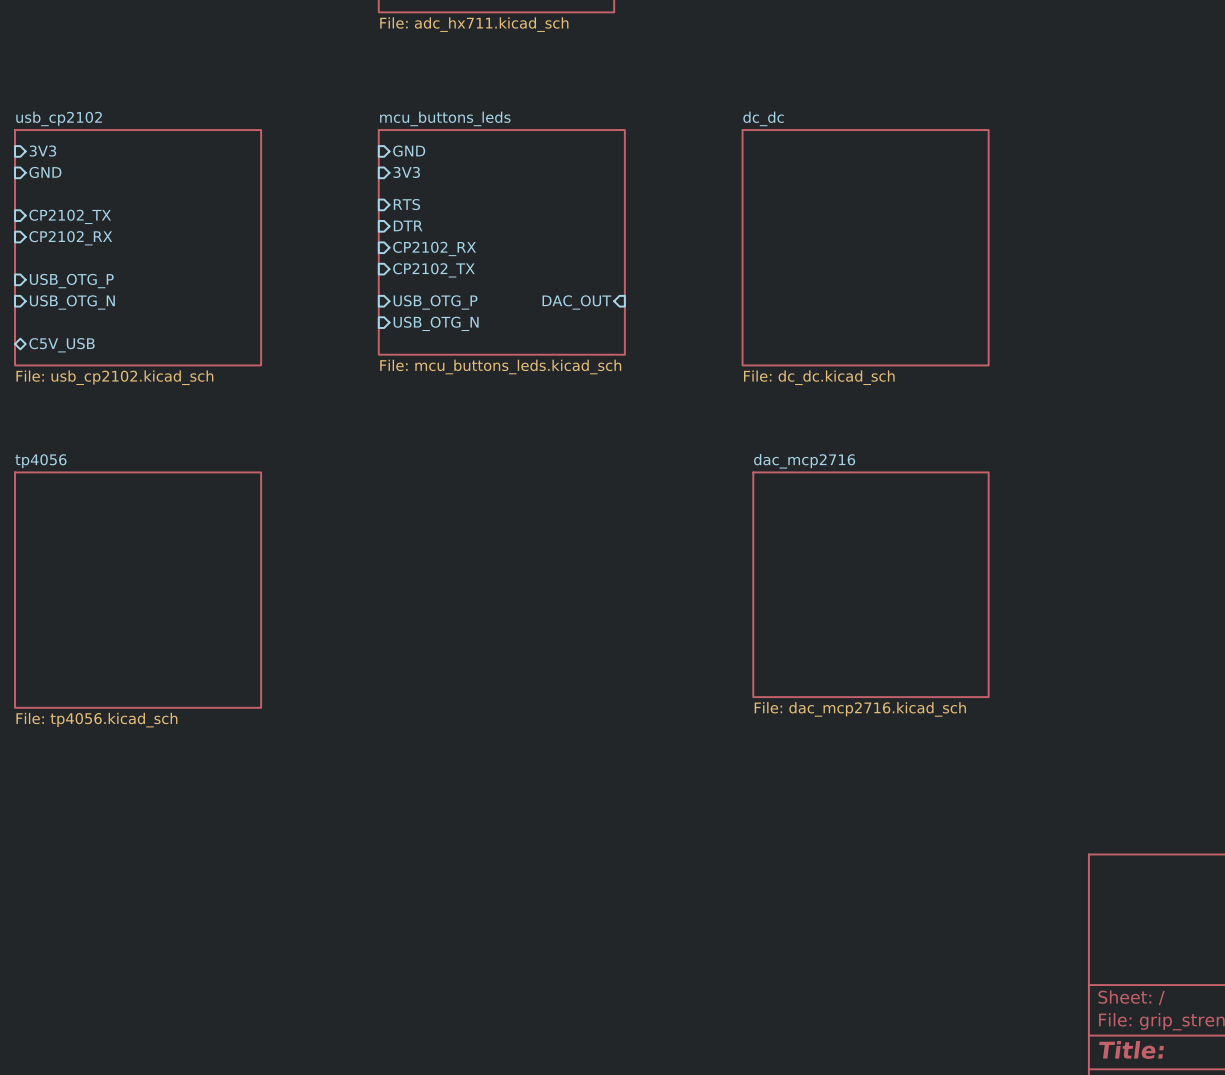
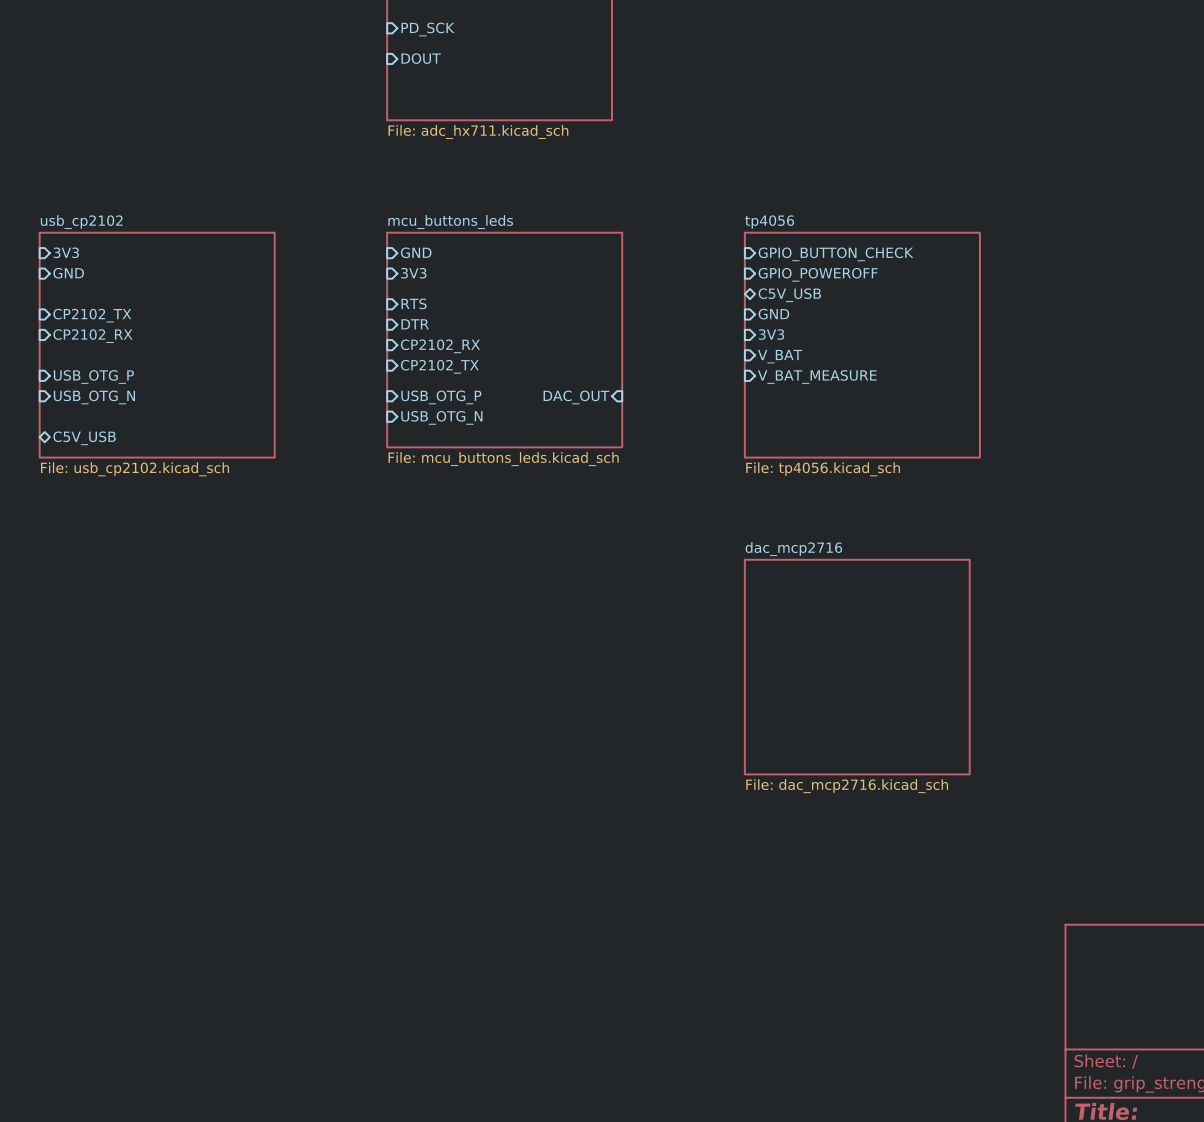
sheet pin: none -> GPIO_BUTTON_CHECK (835, 254)
sheet pin: none -> GPIO_POWEROFF (818, 274)
sheet pin: none -> C5V_USB (789, 295)
sheet pin: none -> GND (773, 314)
sheet pin: none -> 3V3 (771, 334)
sheet dc_dc: File: dc_dc.kicad_sch (865, 247) -> none
sheet pin: none -> V_BAT (780, 356)
sheet pin: none -> V_BAT_MEASURE (817, 376)
sheet tp4056 position: (138, 590) -> (862, 345)

